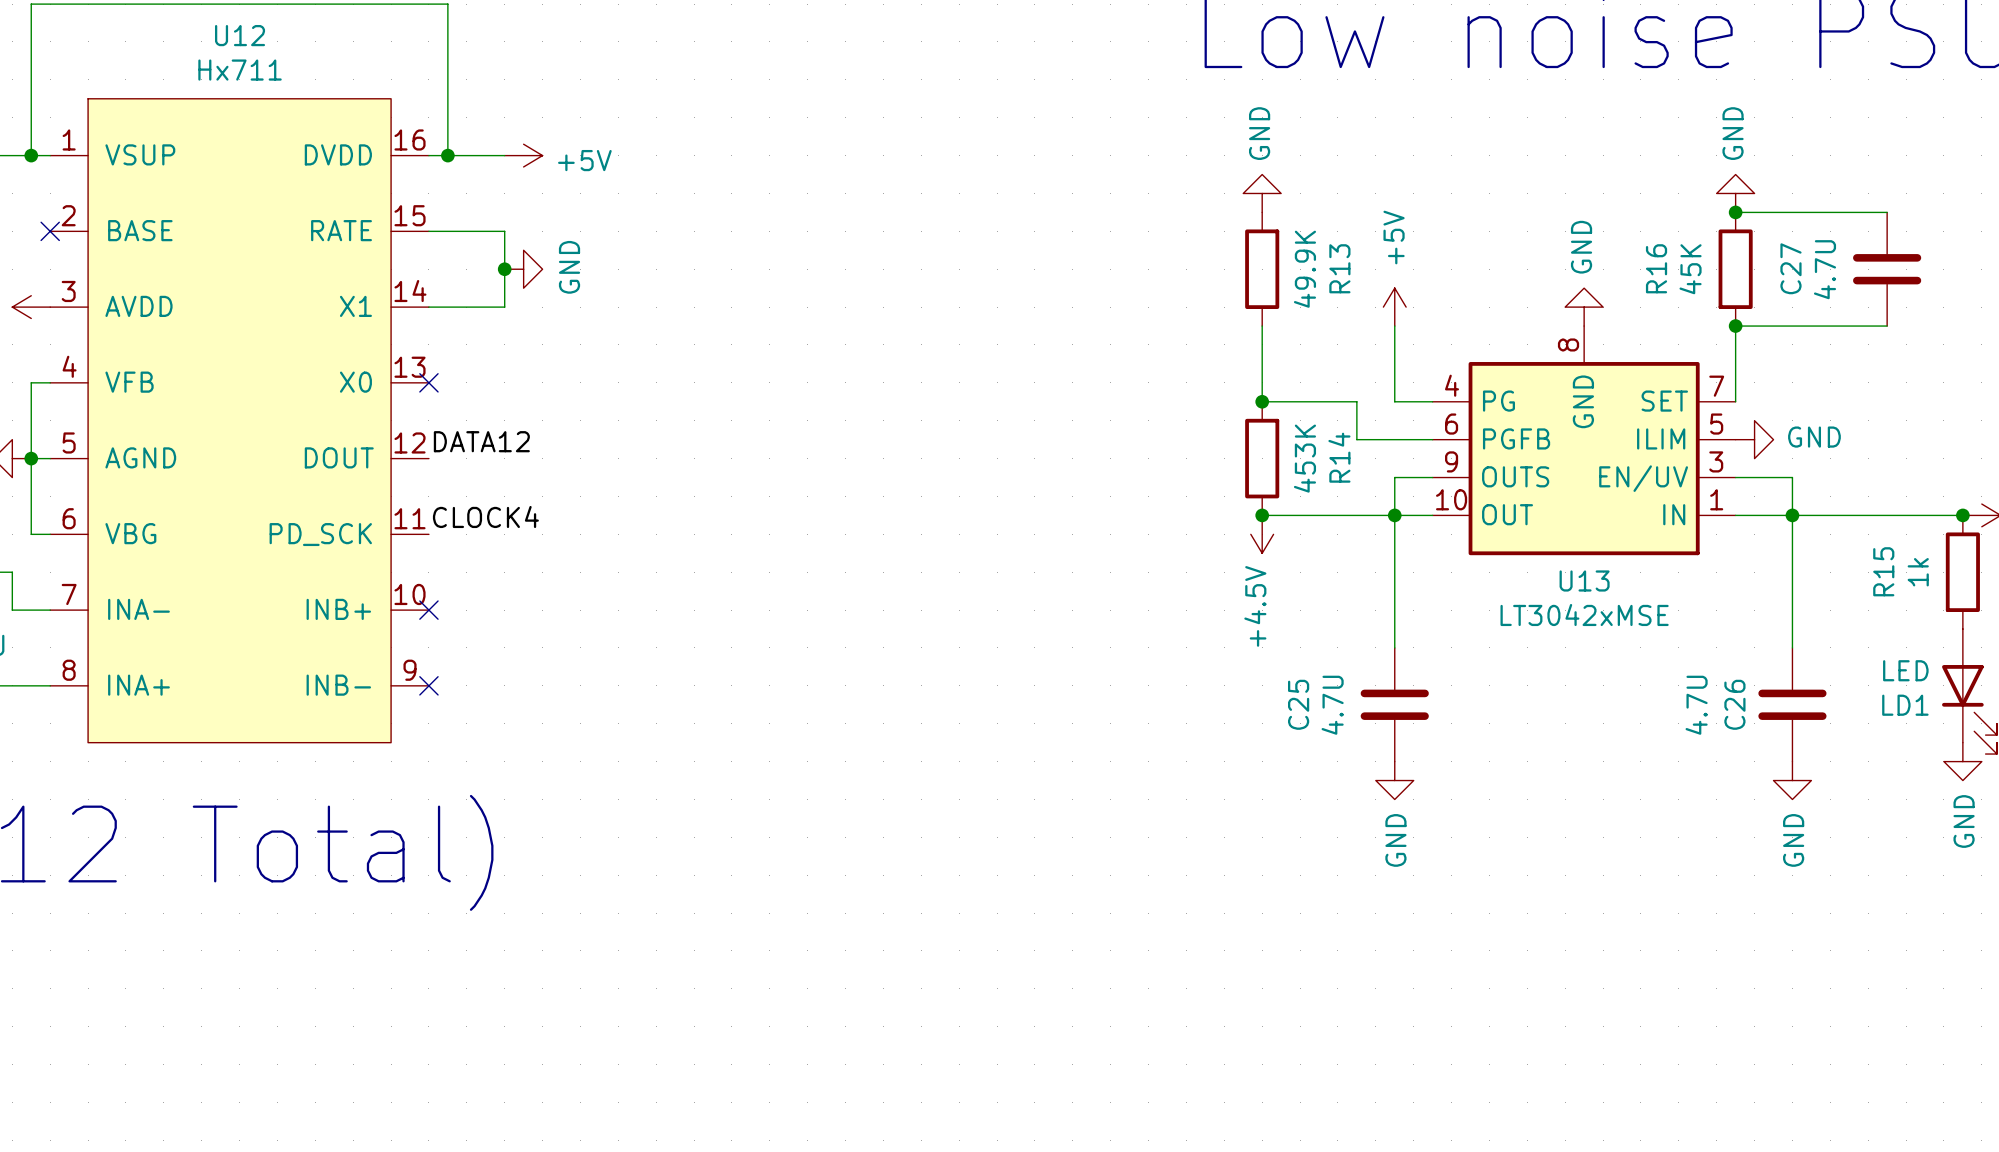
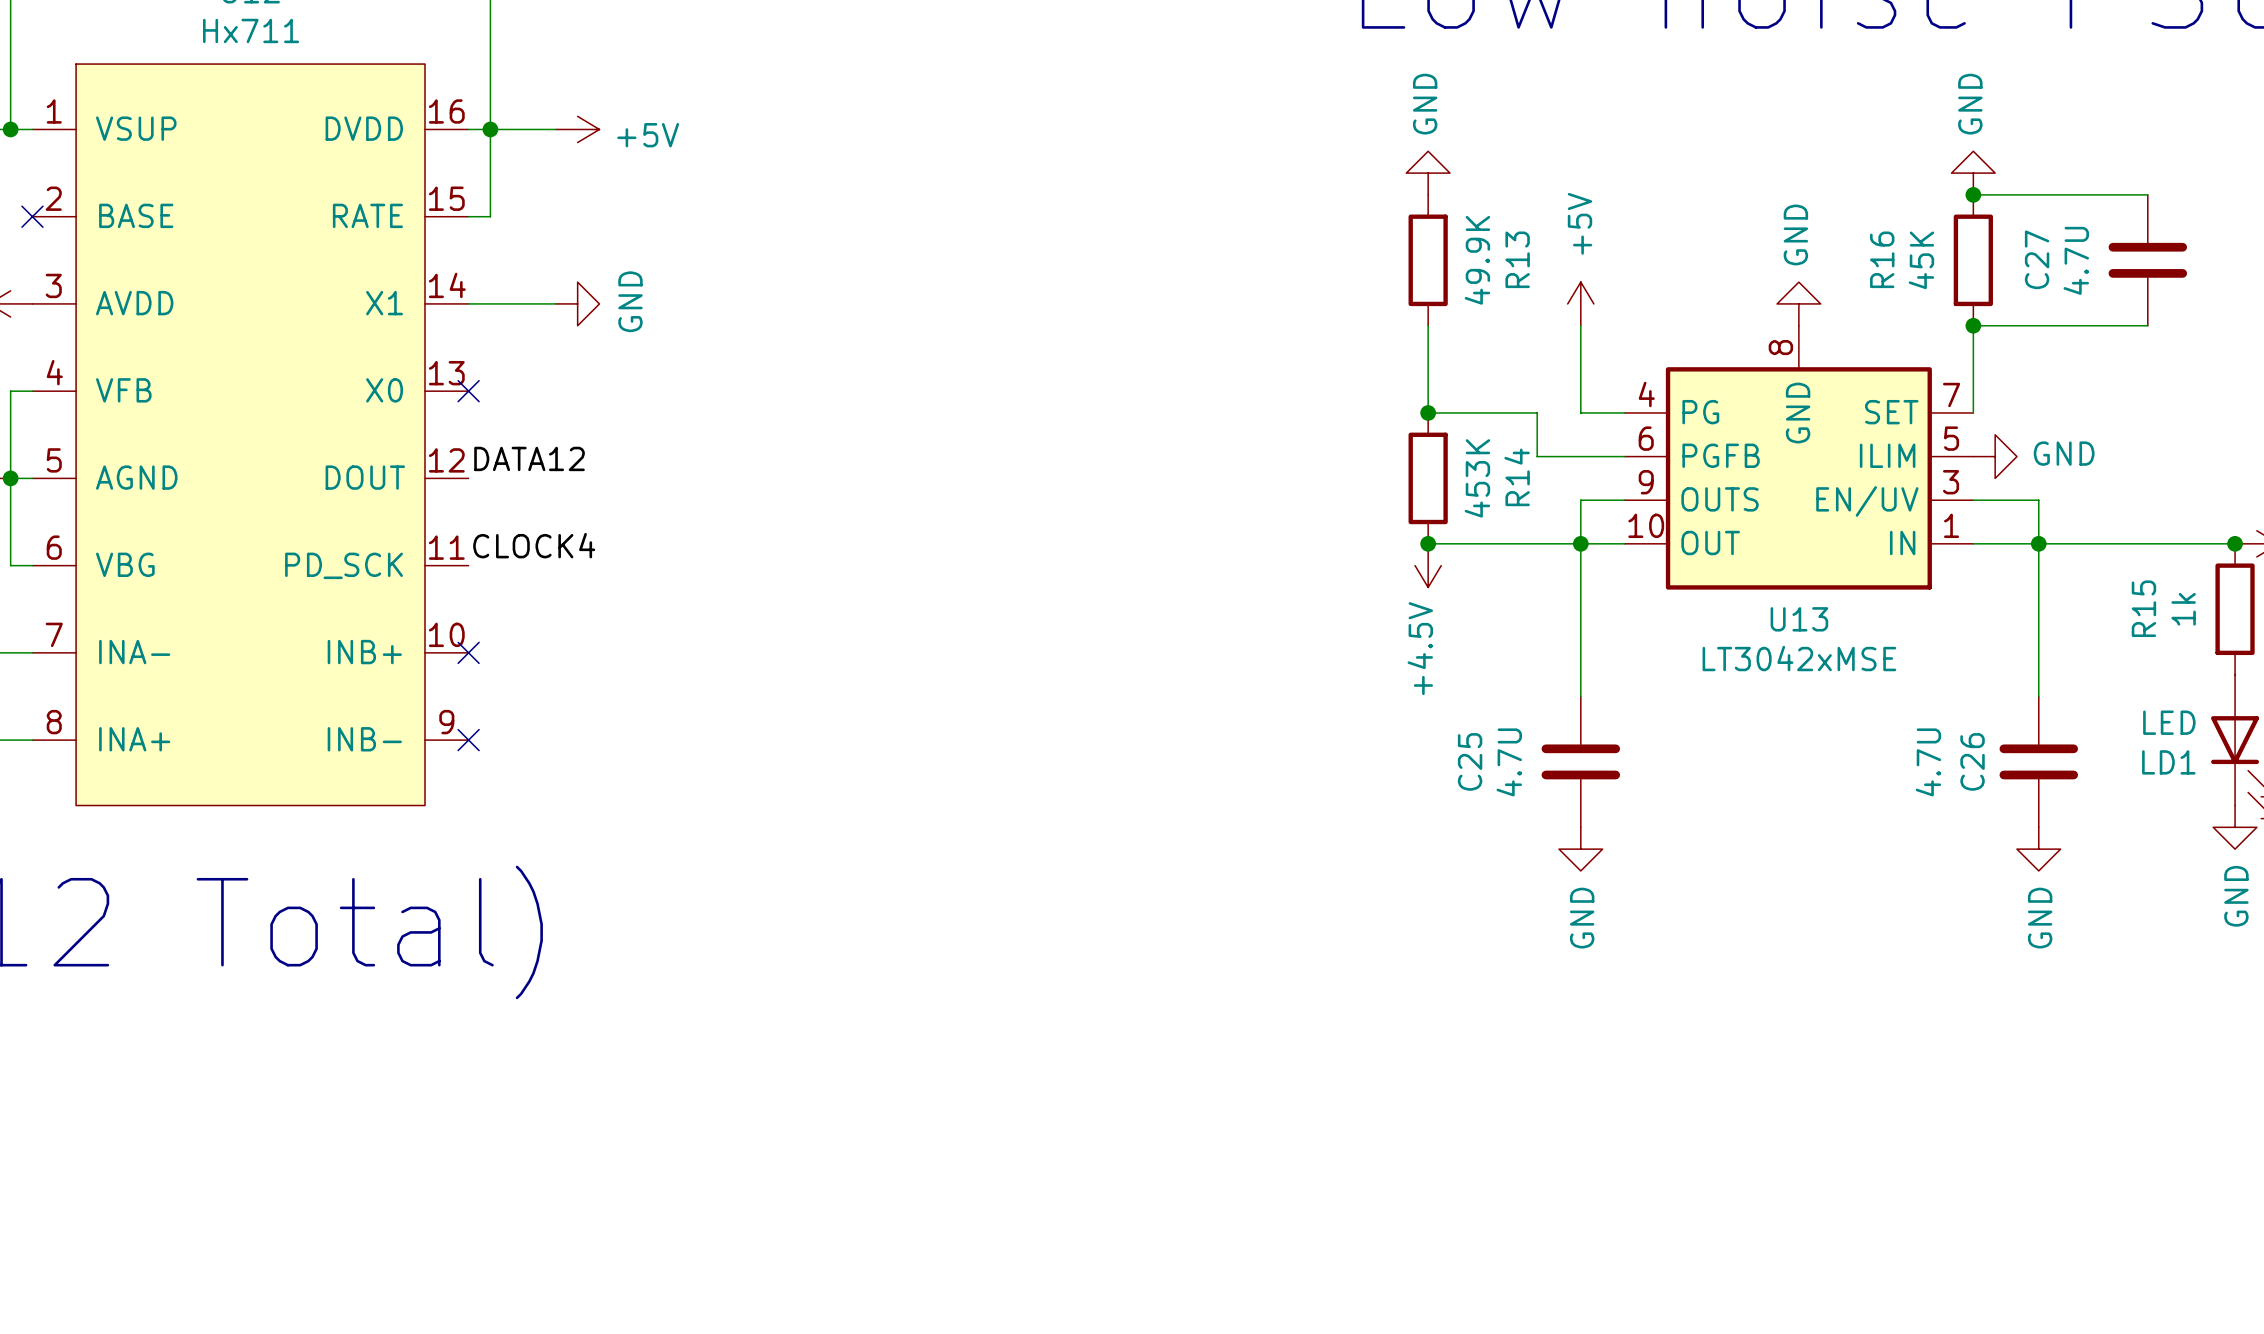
wire: (447, 231) (504, 231) (504, 307) -> (490, 216) (490, 129)
junction: (504, 269) -> none
power symbol position: GND (523, 269) -> GND (577, 303)

